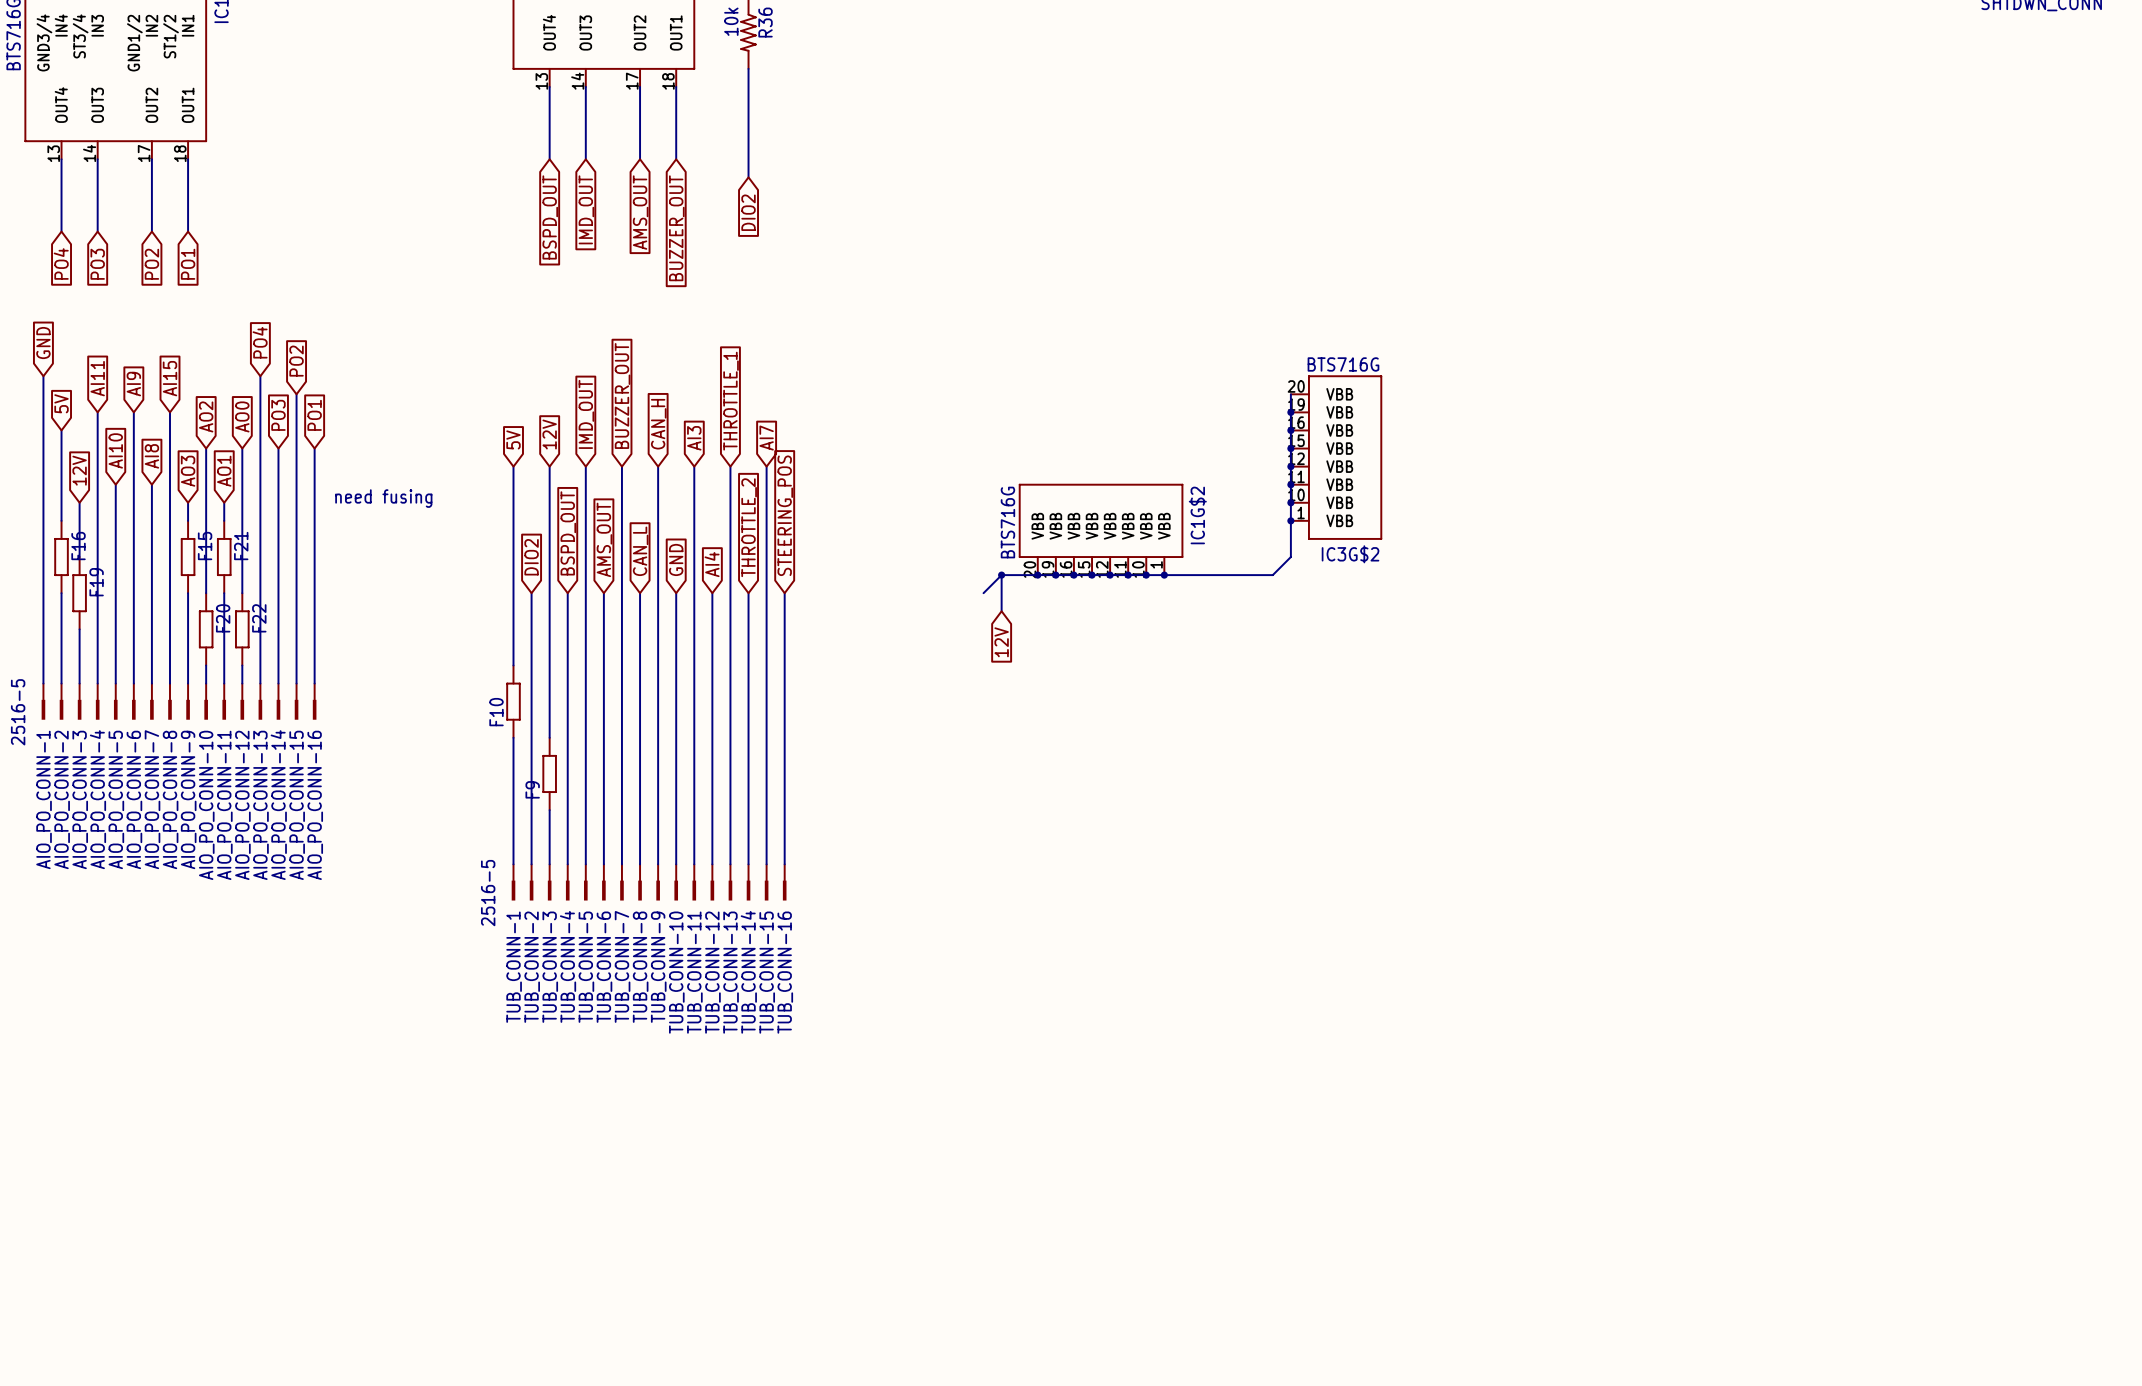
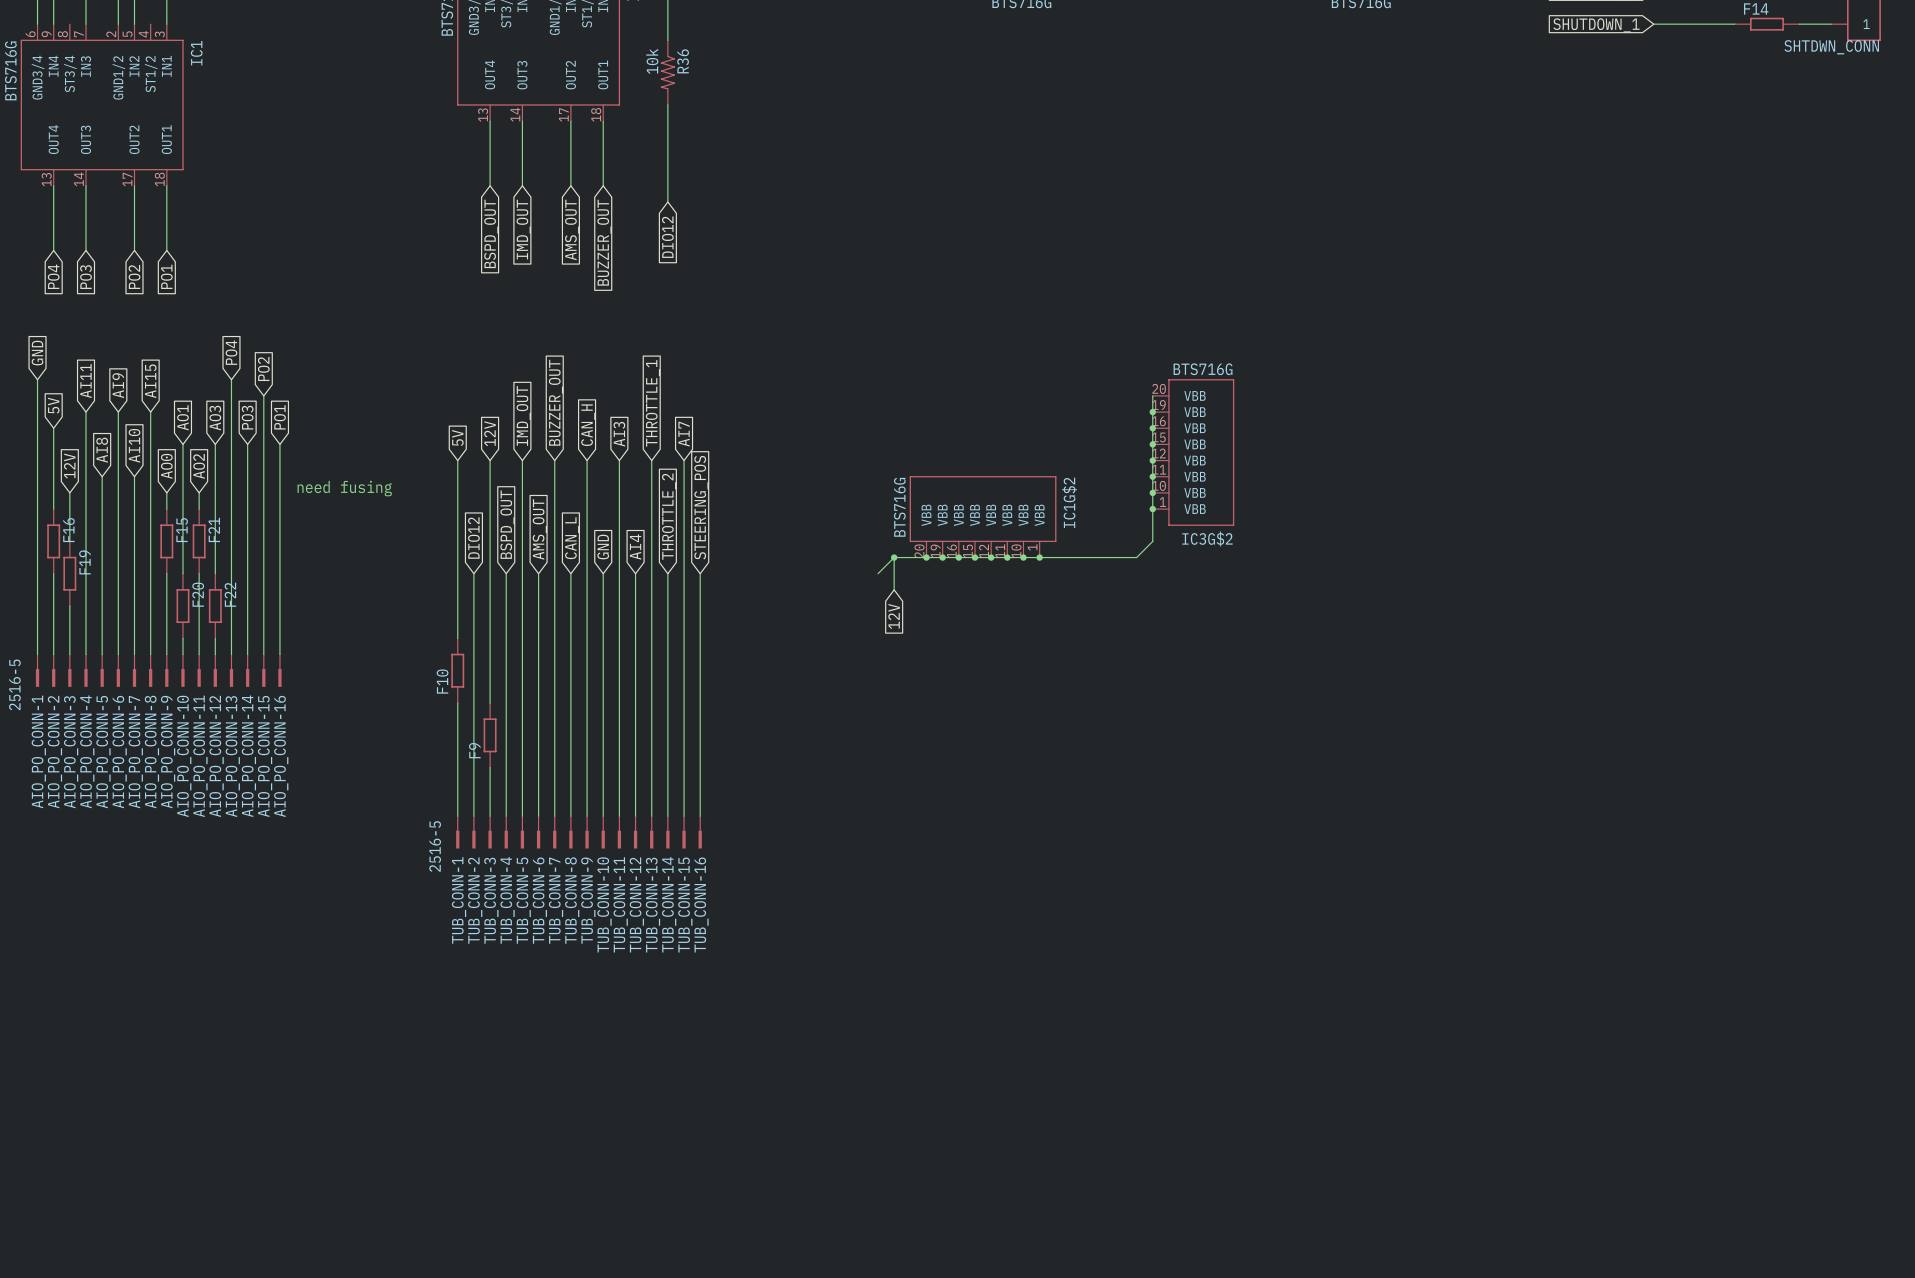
global label: DIO2 (748, 212) -> DIO12 (667, 237)
global label: AO2 (206, 416) -> AO1 (182, 417)
global label: AO0 (242, 416) -> AO3 (215, 418)
global label: AI10 (115, 450) -> AI8 (102, 450)
global label: AI8 (151, 456) -> AI10 (134, 445)
global label: AO3 (188, 471) -> AO0 (166, 466)
global label: AO1 (224, 471) -> AO2 (199, 466)
global label: DIO2 (531, 557) -> DIO12 (473, 538)

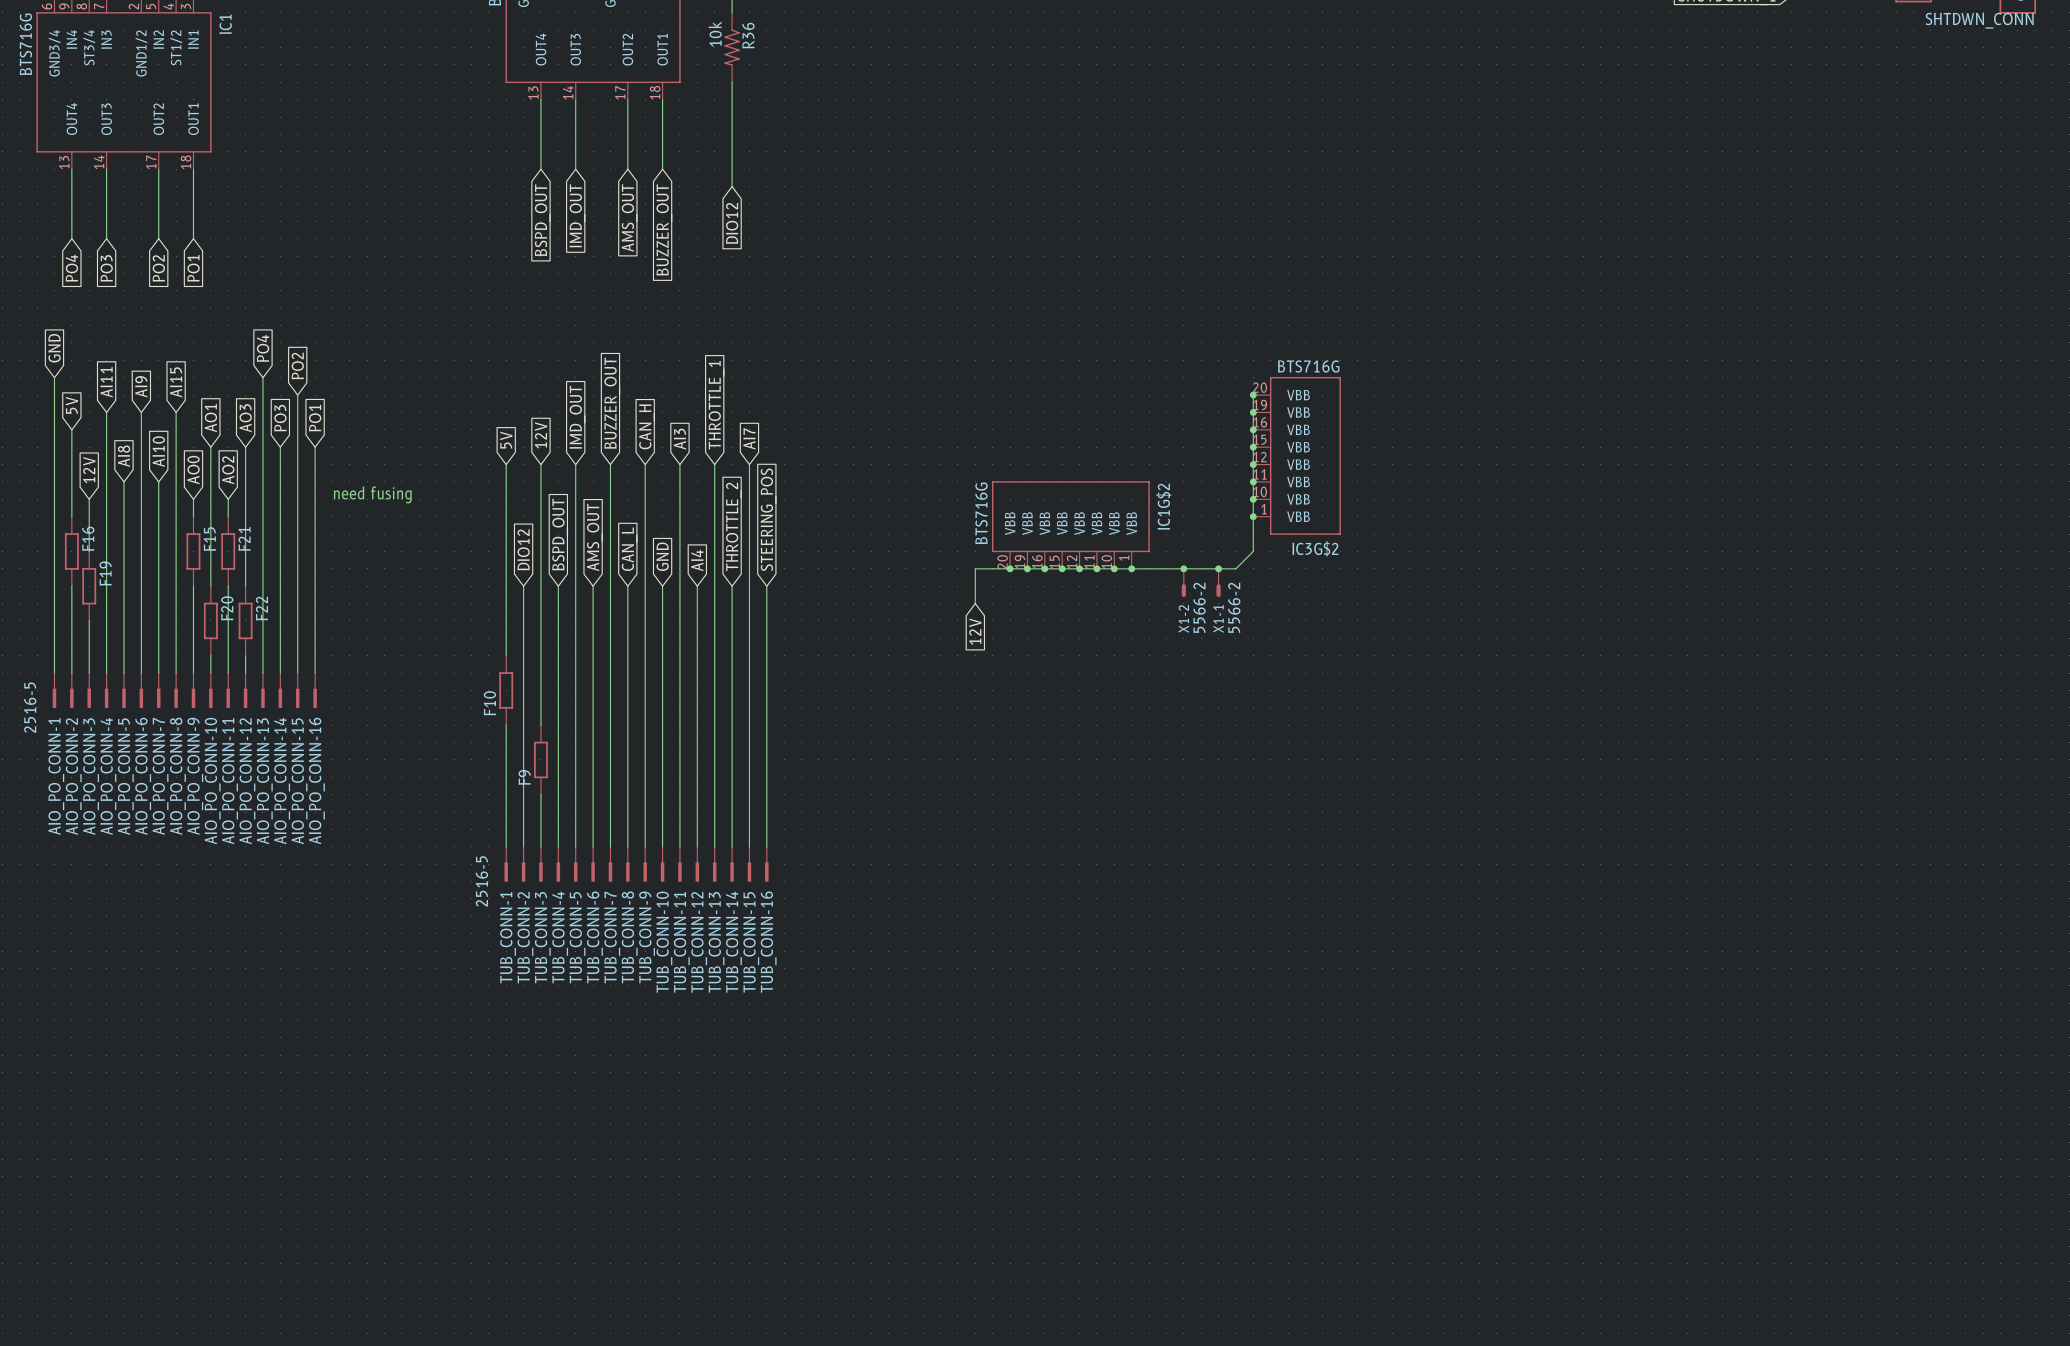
junction: none -> (1253, 395)
wire: (894, 557) (878, 573) -> none
junction: (894, 557) -> none
junction: none -> (1183, 568)
junction: none -> (1218, 568)
X1-2: none -> 5566-2 (1183, 582)
X1-1: none -> 5566-2 (1218, 582)

